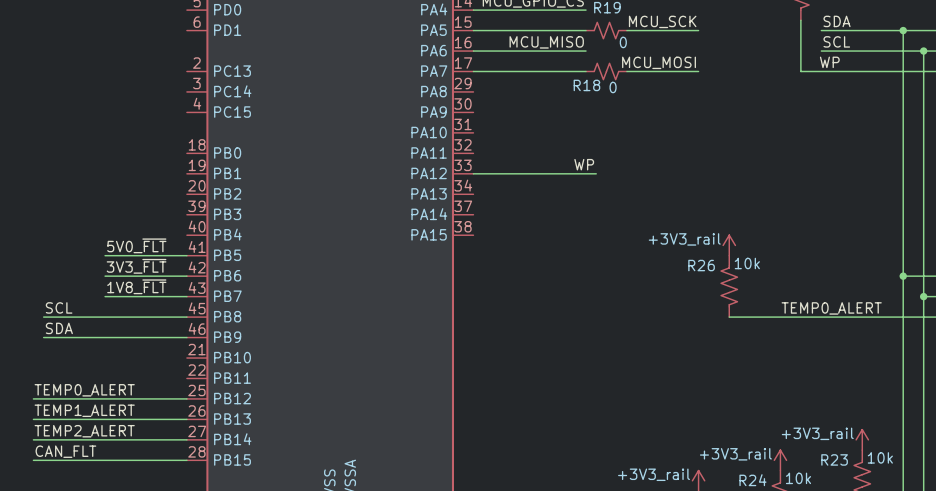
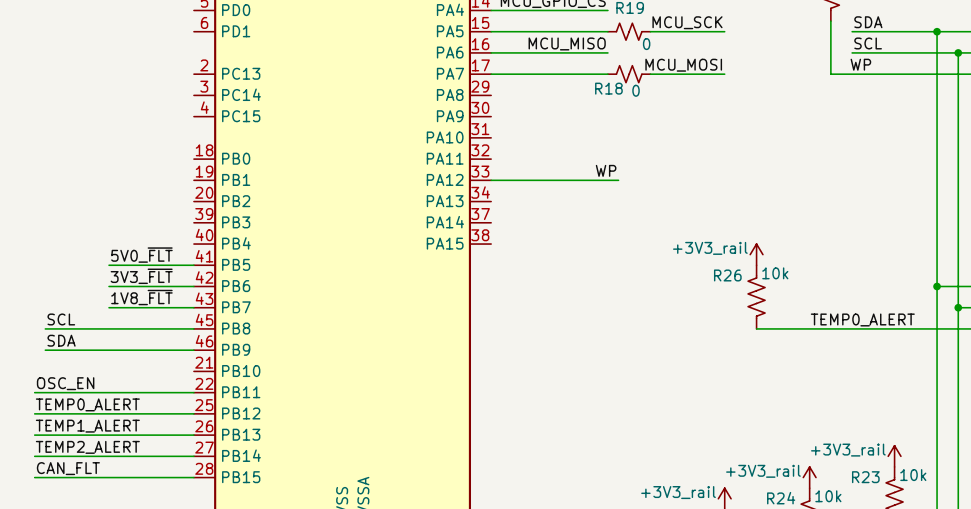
label: none -> OSC_EN (65, 383)
wire: none -> (34, 392) (193, 392)

